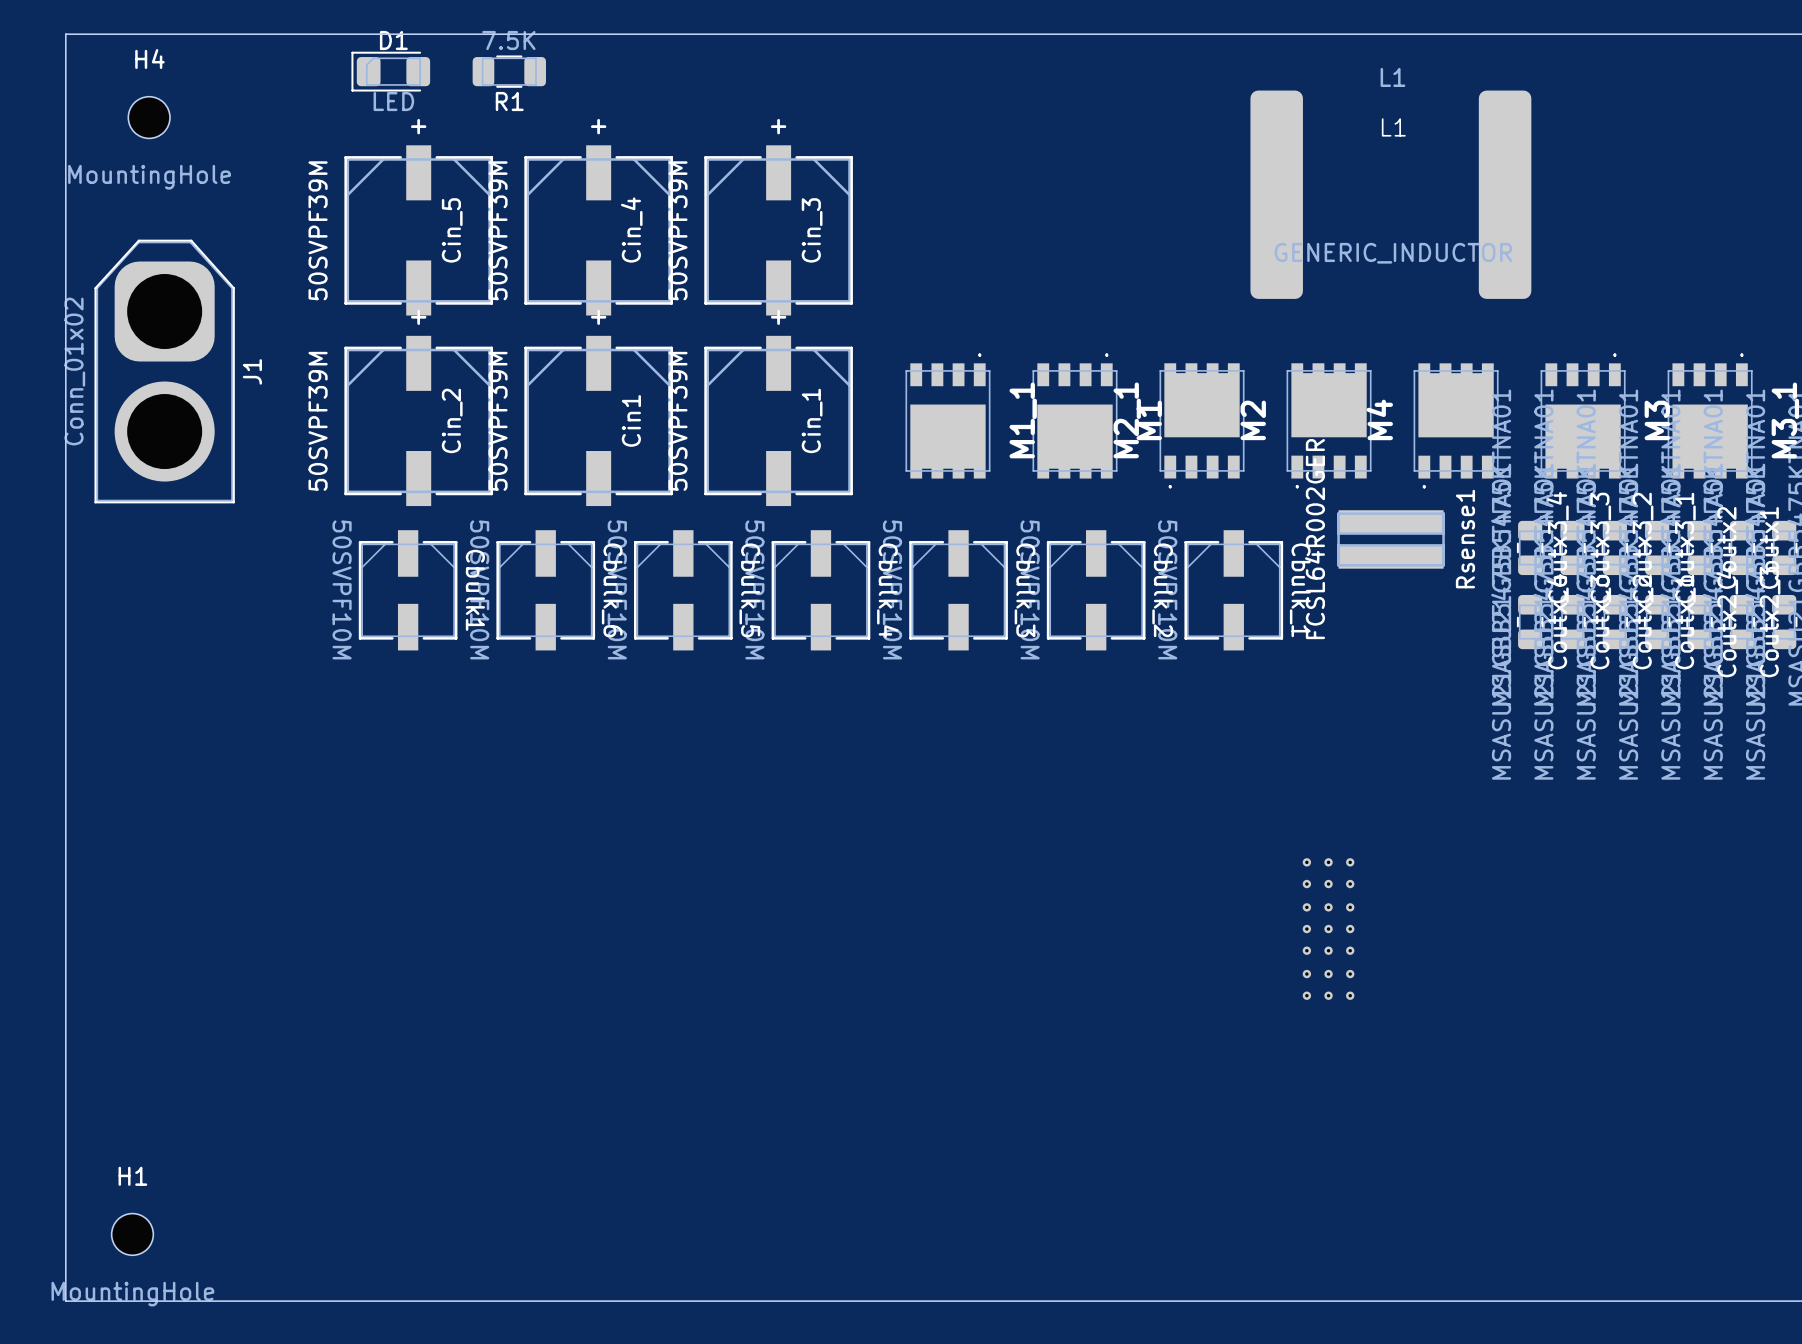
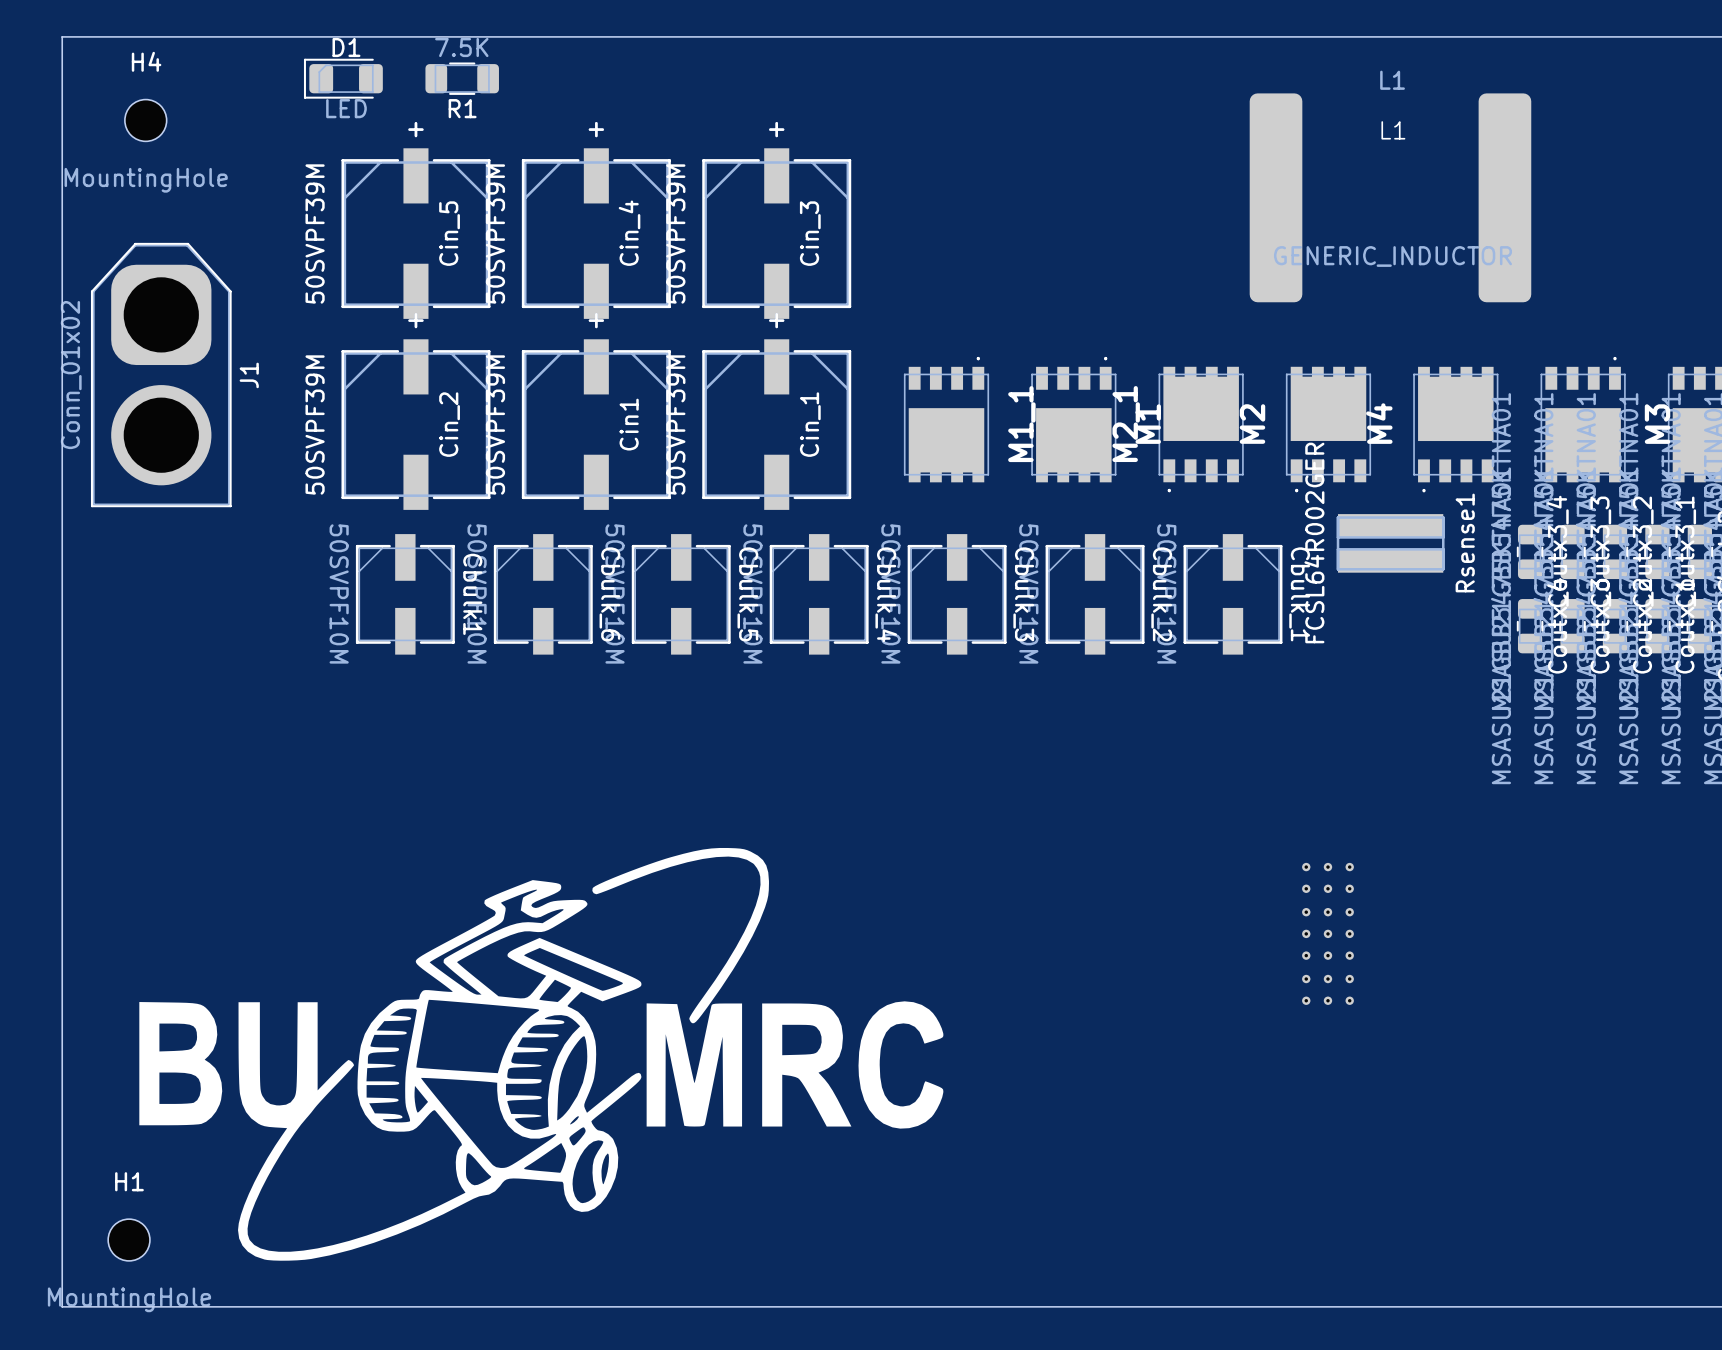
D1 position: (390, 71) -> (343, 78)
R1 position: (509, 71) -> (462, 78)
drawing: none -> [139, 847, 944, 1261]

